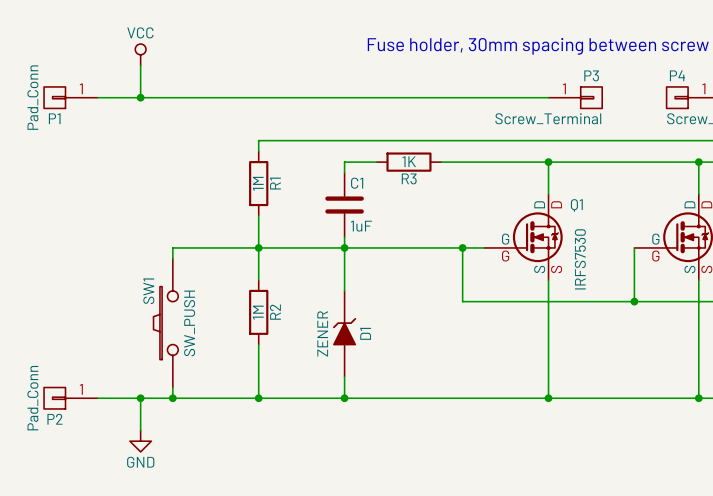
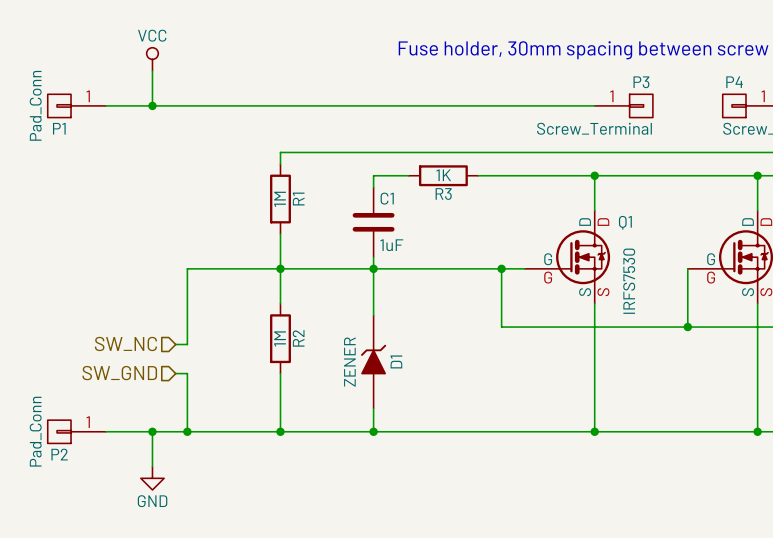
wire: none -> (187, 280) (187, 344) (175, 344)
hierarchical label: none -> SW_NC (125, 343)
SW1: SW_PUSH (165, 323) -> none
hierarchical label: none -> SW_GND (119, 373)

